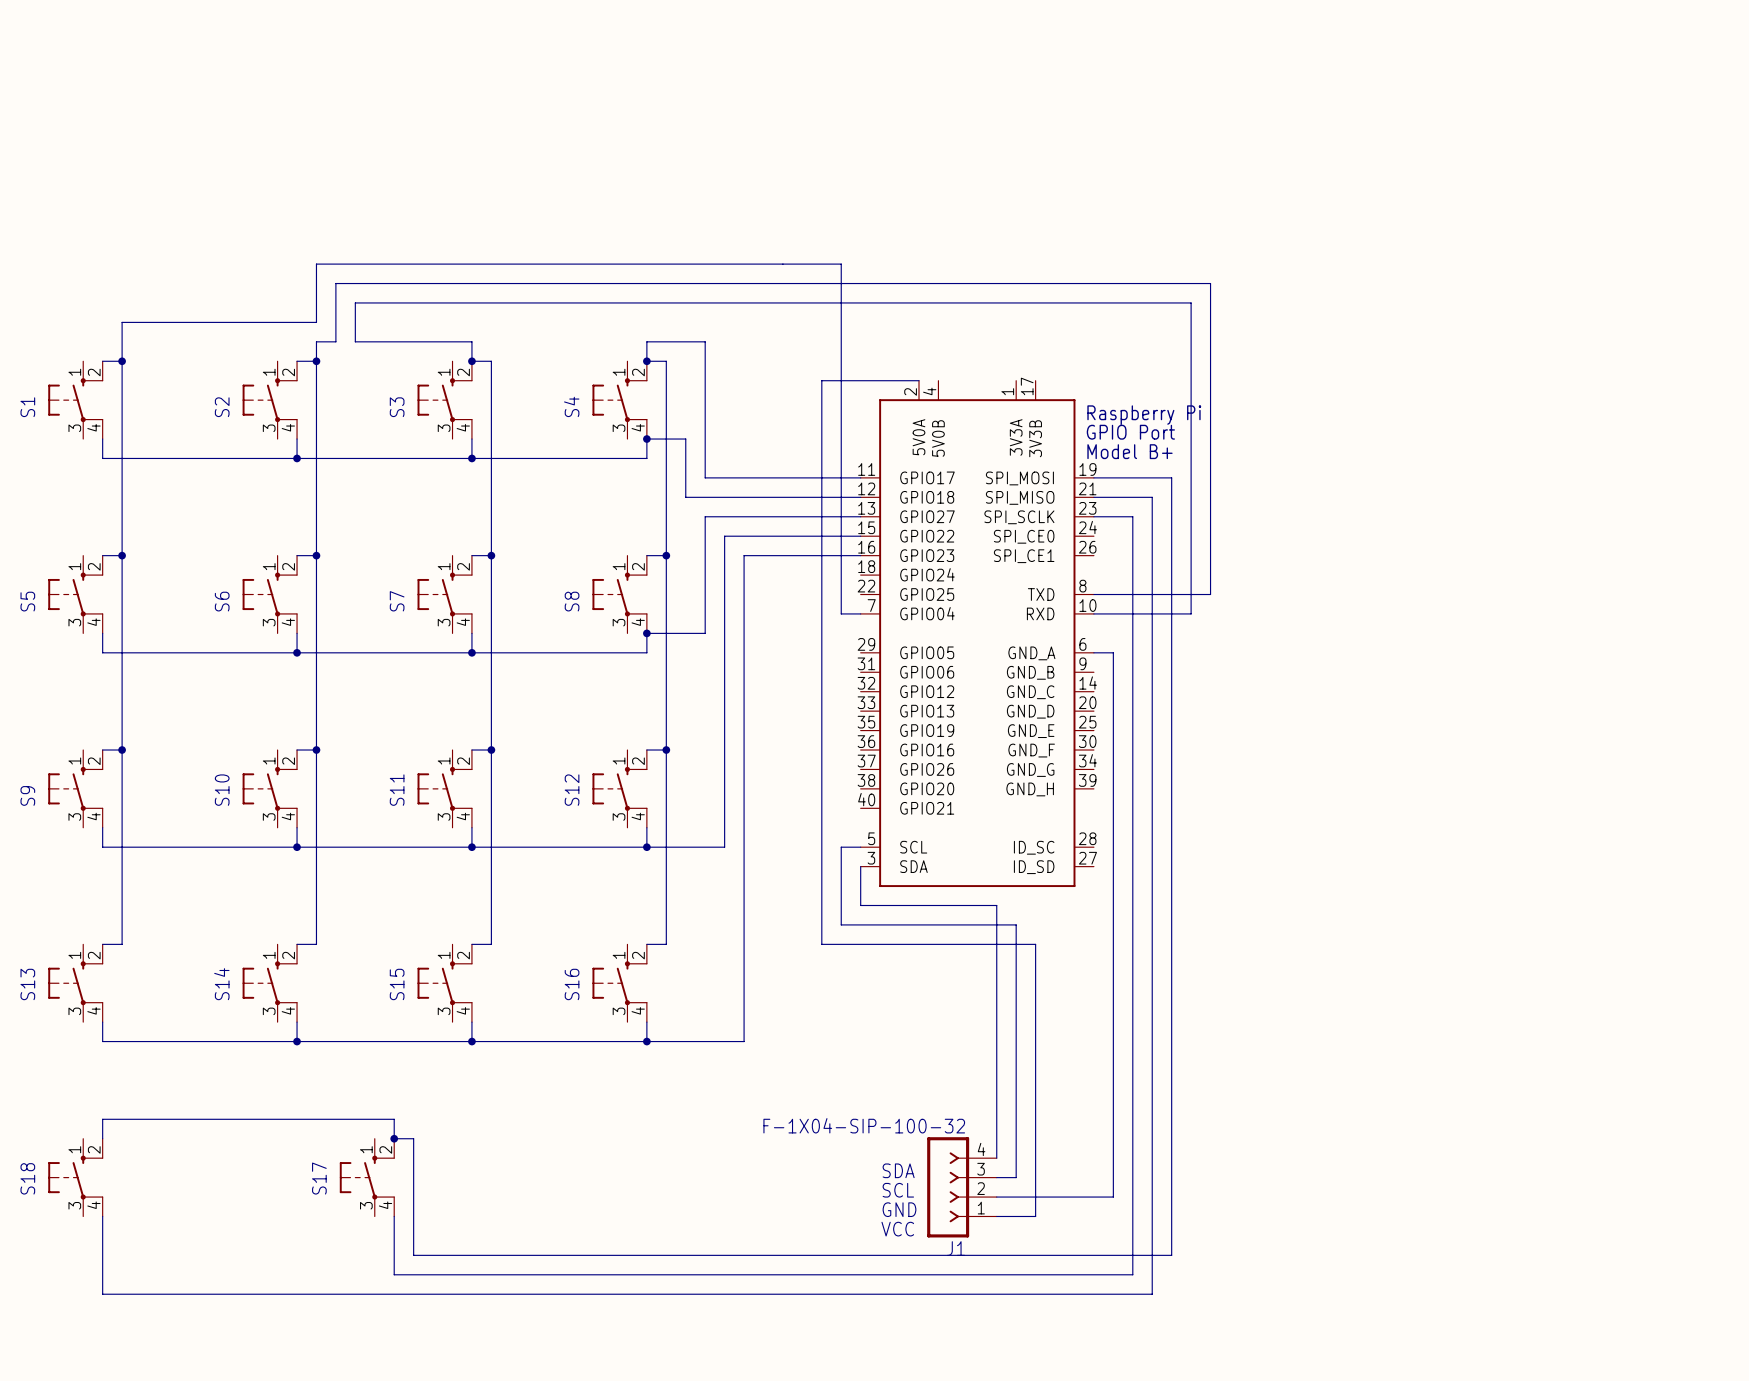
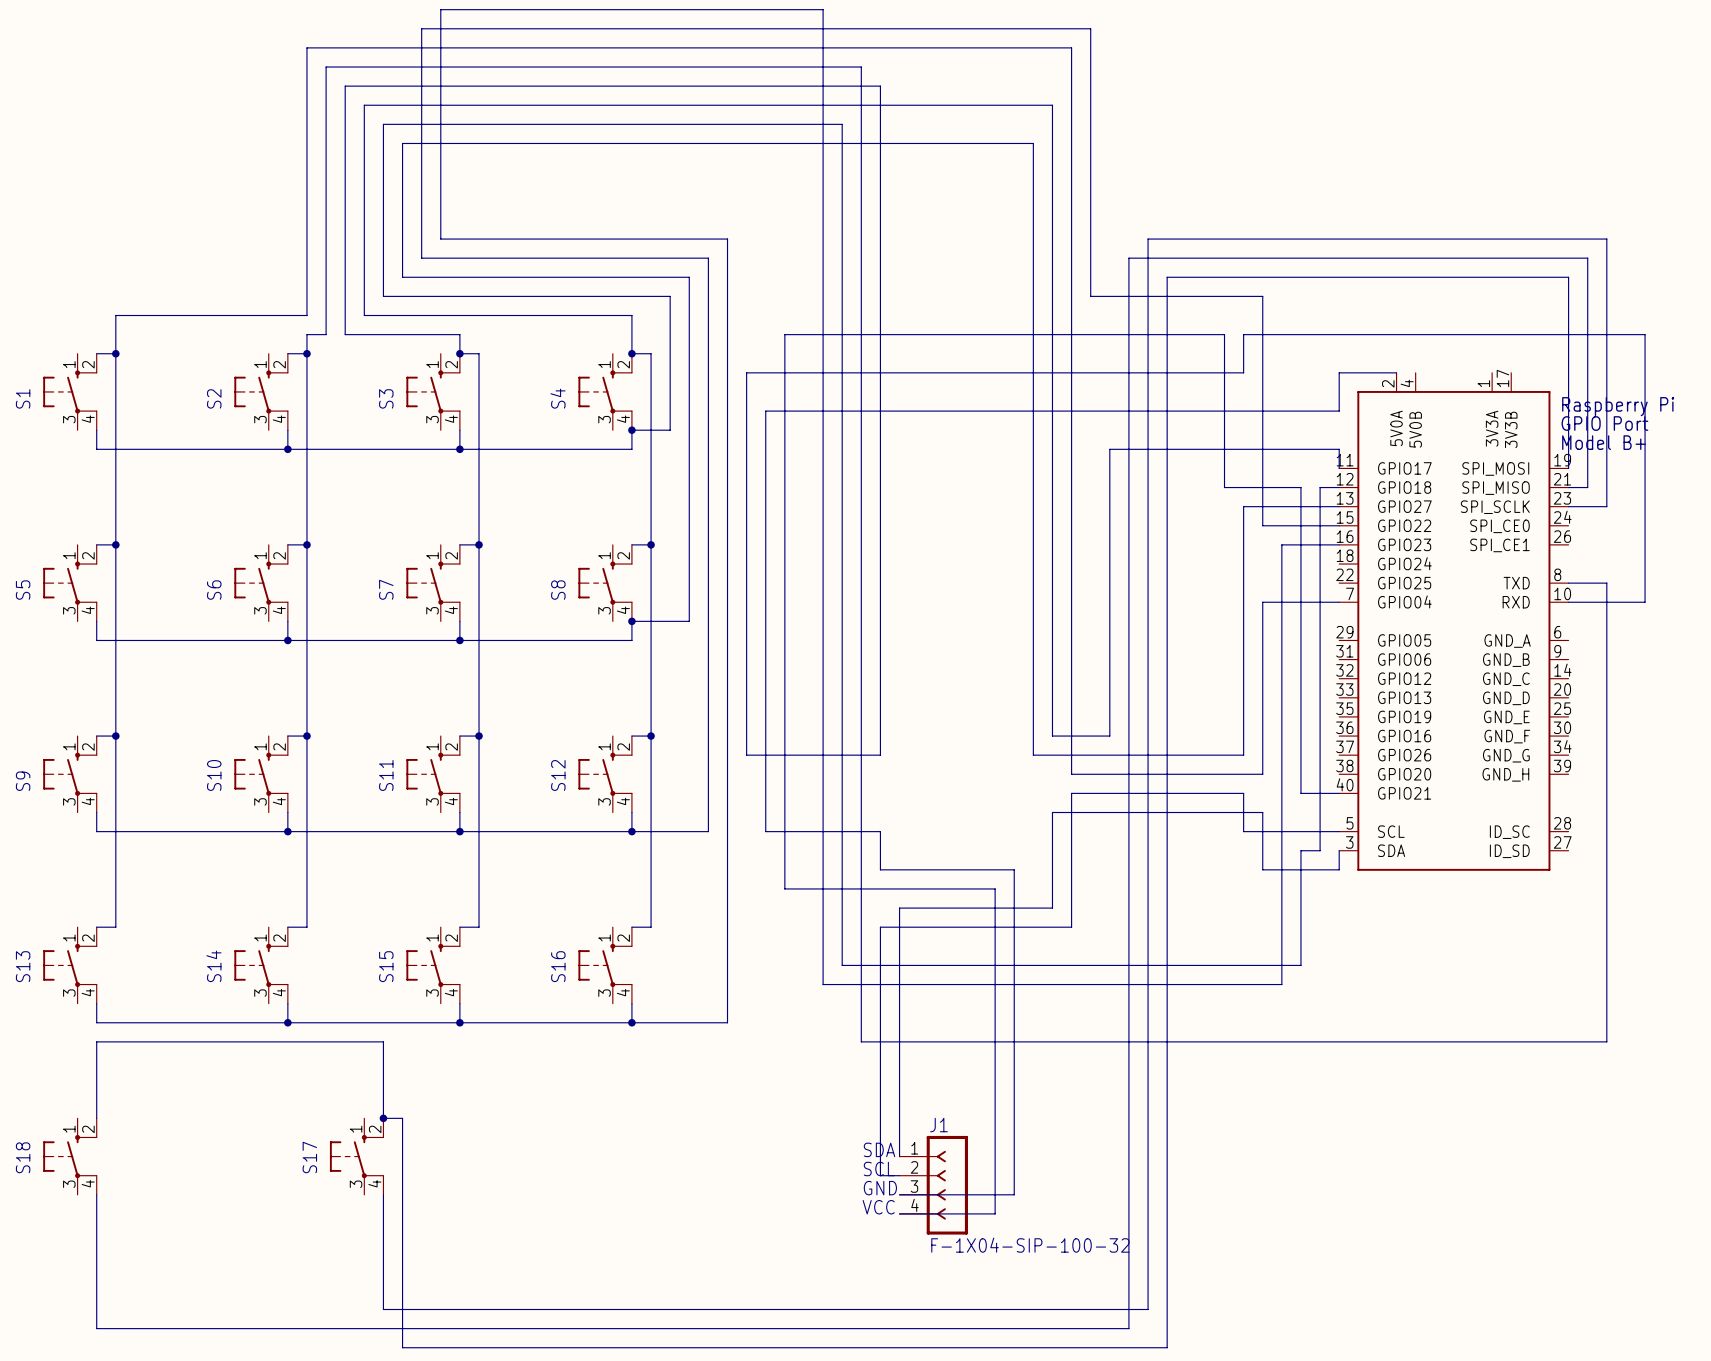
wire: (316, 264) (433, 264) -> (306, 258) (306, 47) (1071, 47) (1071, 774) (1262, 774) (1262, 602) (1339, 602)
wire: (724, 264) (841, 264) -> (727, 544) (727, 239) (440, 239) (440, 9) (823, 9) (823, 258)
wire: (335, 283) (413, 283) -> (1339, 506) (1243, 506) (1243, 755) (1033, 755) (1033, 143) (402, 143) (402, 277)
wire: none -> (326, 277) (326, 67) (861, 67) (861, 1041) (1606, 1041) (1606, 583) (1568, 583)
wire: (705, 283) (1191, 283) -> (1339, 525) (1262, 525) (1262, 296) (1167, 296) (1167, 277)
wire: (1210, 283) (1210, 594) (1093, 594) -> (1186, 277) (1568, 277) (1568, 468)
wire: (355, 302) (394, 302) -> (345, 296) (345, 86) (880, 86) (880, 755) (746, 755) (746, 372) (803, 372)
wire: none -> (383, 296) (383, 124) (842, 124) (842, 850)
wire: (685, 302) (1113, 302) -> (421, 258) (421, 28) (1090, 28) (1090, 296)
wire: (646, 341) (705, 341) -> (689, 277) (689, 334)
wire: (821, 380) (821, 944) (899, 944) -> (899, 1175) (880, 1175) (880, 927)
wire: none -> (899, 372) (1243, 372) (1243, 334) (1645, 334) (1645, 602) (1568, 602)
wire: (685, 439) (685, 497) (860, 497) -> (670, 430) (670, 296)
wire: (705, 477) (860, 477) -> (689, 468) (689, 506)
wire: (1093, 477) (1171, 477) -> (1568, 506) (1606, 506) (1606, 239) (1148, 239) (1148, 468)
wire: (1093, 497) (1152, 497) -> (1568, 487) (1587, 487) (1587, 258) (1128, 258) (1128, 487)
wire: none -> (1339, 487) (1320, 487) (1320, 850) (1300, 850) (1300, 965) (842, 965) (842, 888) (784, 888) (784, 334) (1224, 334) (1224, 487) (1300, 487) (1300, 793) (1339, 793)
wire: (705, 516) (860, 516) -> none
wire: (1093, 516) (1132, 516) -> (1339, 468) (1339, 449) (1109, 449) (1109, 506)
wire: (724, 536) (860, 536) -> (708, 525) (708, 258)
wire: (744, 555) (860, 555) -> none
wire: none -> (1339, 544) (1281, 544) (1281, 984) (823, 984) (823, 908)
wire: (841, 613) (860, 613) -> (823, 602) (823, 831) (765, 831) (765, 411) (1339, 411) (1339, 372) (1396, 372)
wire: (1093, 613) (1191, 613) -> (402, 1233) (402, 1347) (1167, 1347) (1167, 602)
part: (977, 633) -> none
part: none -> (1453, 621)
wire: (1093, 652) (1113, 652) (1113, 1197) (996, 1197) -> none
wire: (1132, 750) (1132, 1274) (394, 1274) -> (1109, 736) (1052, 736) (1052, 105) (364, 105) (364, 315) (631, 315) (631, 334)
wire: none -> (842, 831) (880, 831) (880, 869) (1014, 869) (1014, 927) (1071, 927) (1071, 793) (1243, 793) (1243, 831) (1339, 831)
wire: (996, 905) (996, 1158) -> (976, 888) (995, 888) (995, 908) (1052, 908) (1052, 812) (1262, 812) (1262, 869) (1339, 869) (1339, 850)
wire: (841, 924) (918, 924) -> (899, 1156) (899, 908)
wire: (102, 1119) (394, 1119) -> (96, 1099) (96, 1041) (383, 1041) (383, 1099)
wire: (996, 1177) (1016, 1177) -> (899, 1213) (995, 1213) (995, 1156)
J1 rotation: 0° (948, 1187) -> 180° (947, 1185)
wire: (413, 1255) (1171, 1255) -> (383, 1252) (383, 1309) (1148, 1309) (1148, 1233)
wire: (102, 1294) (1152, 1294) -> (96, 1271) (96, 1328) (1128, 1328) (1128, 1271)

